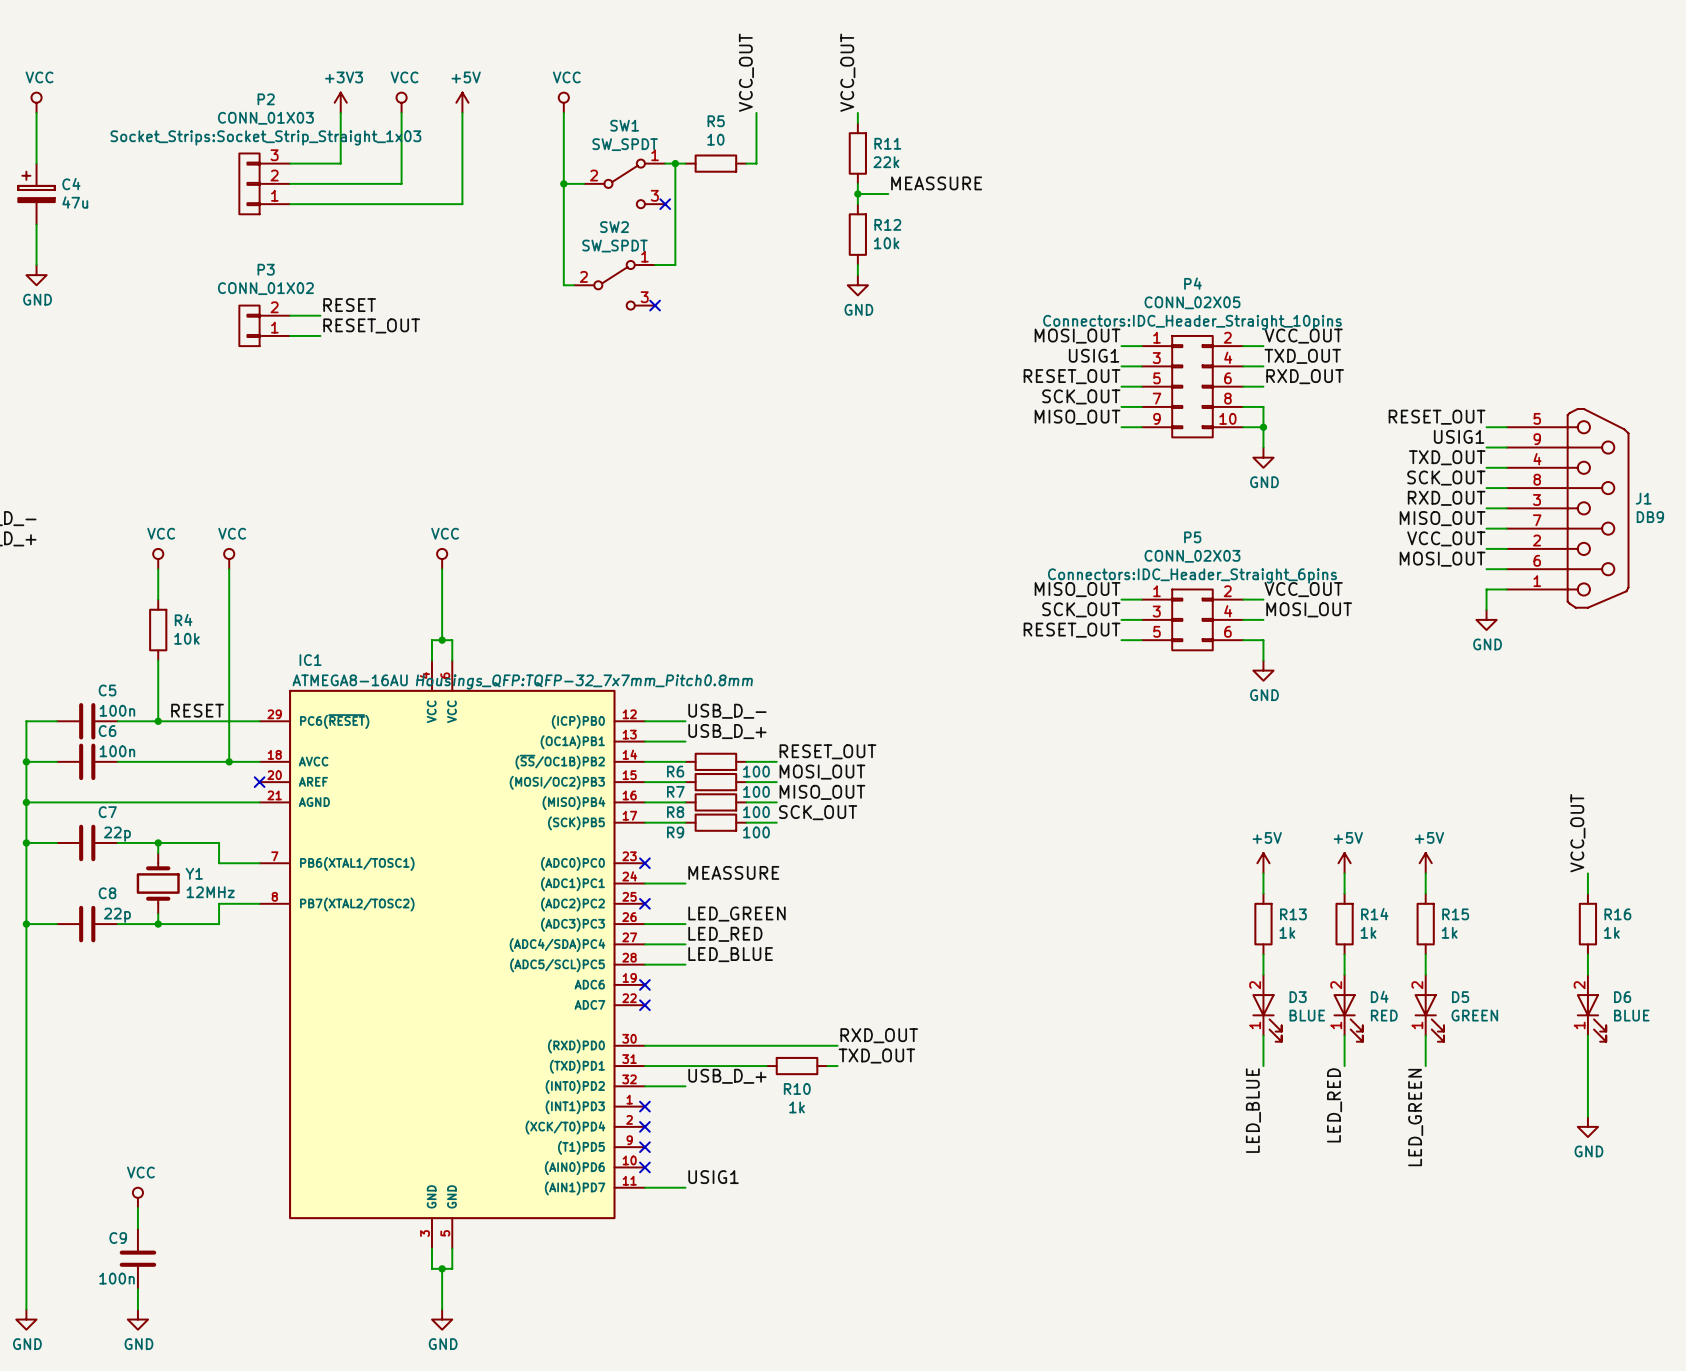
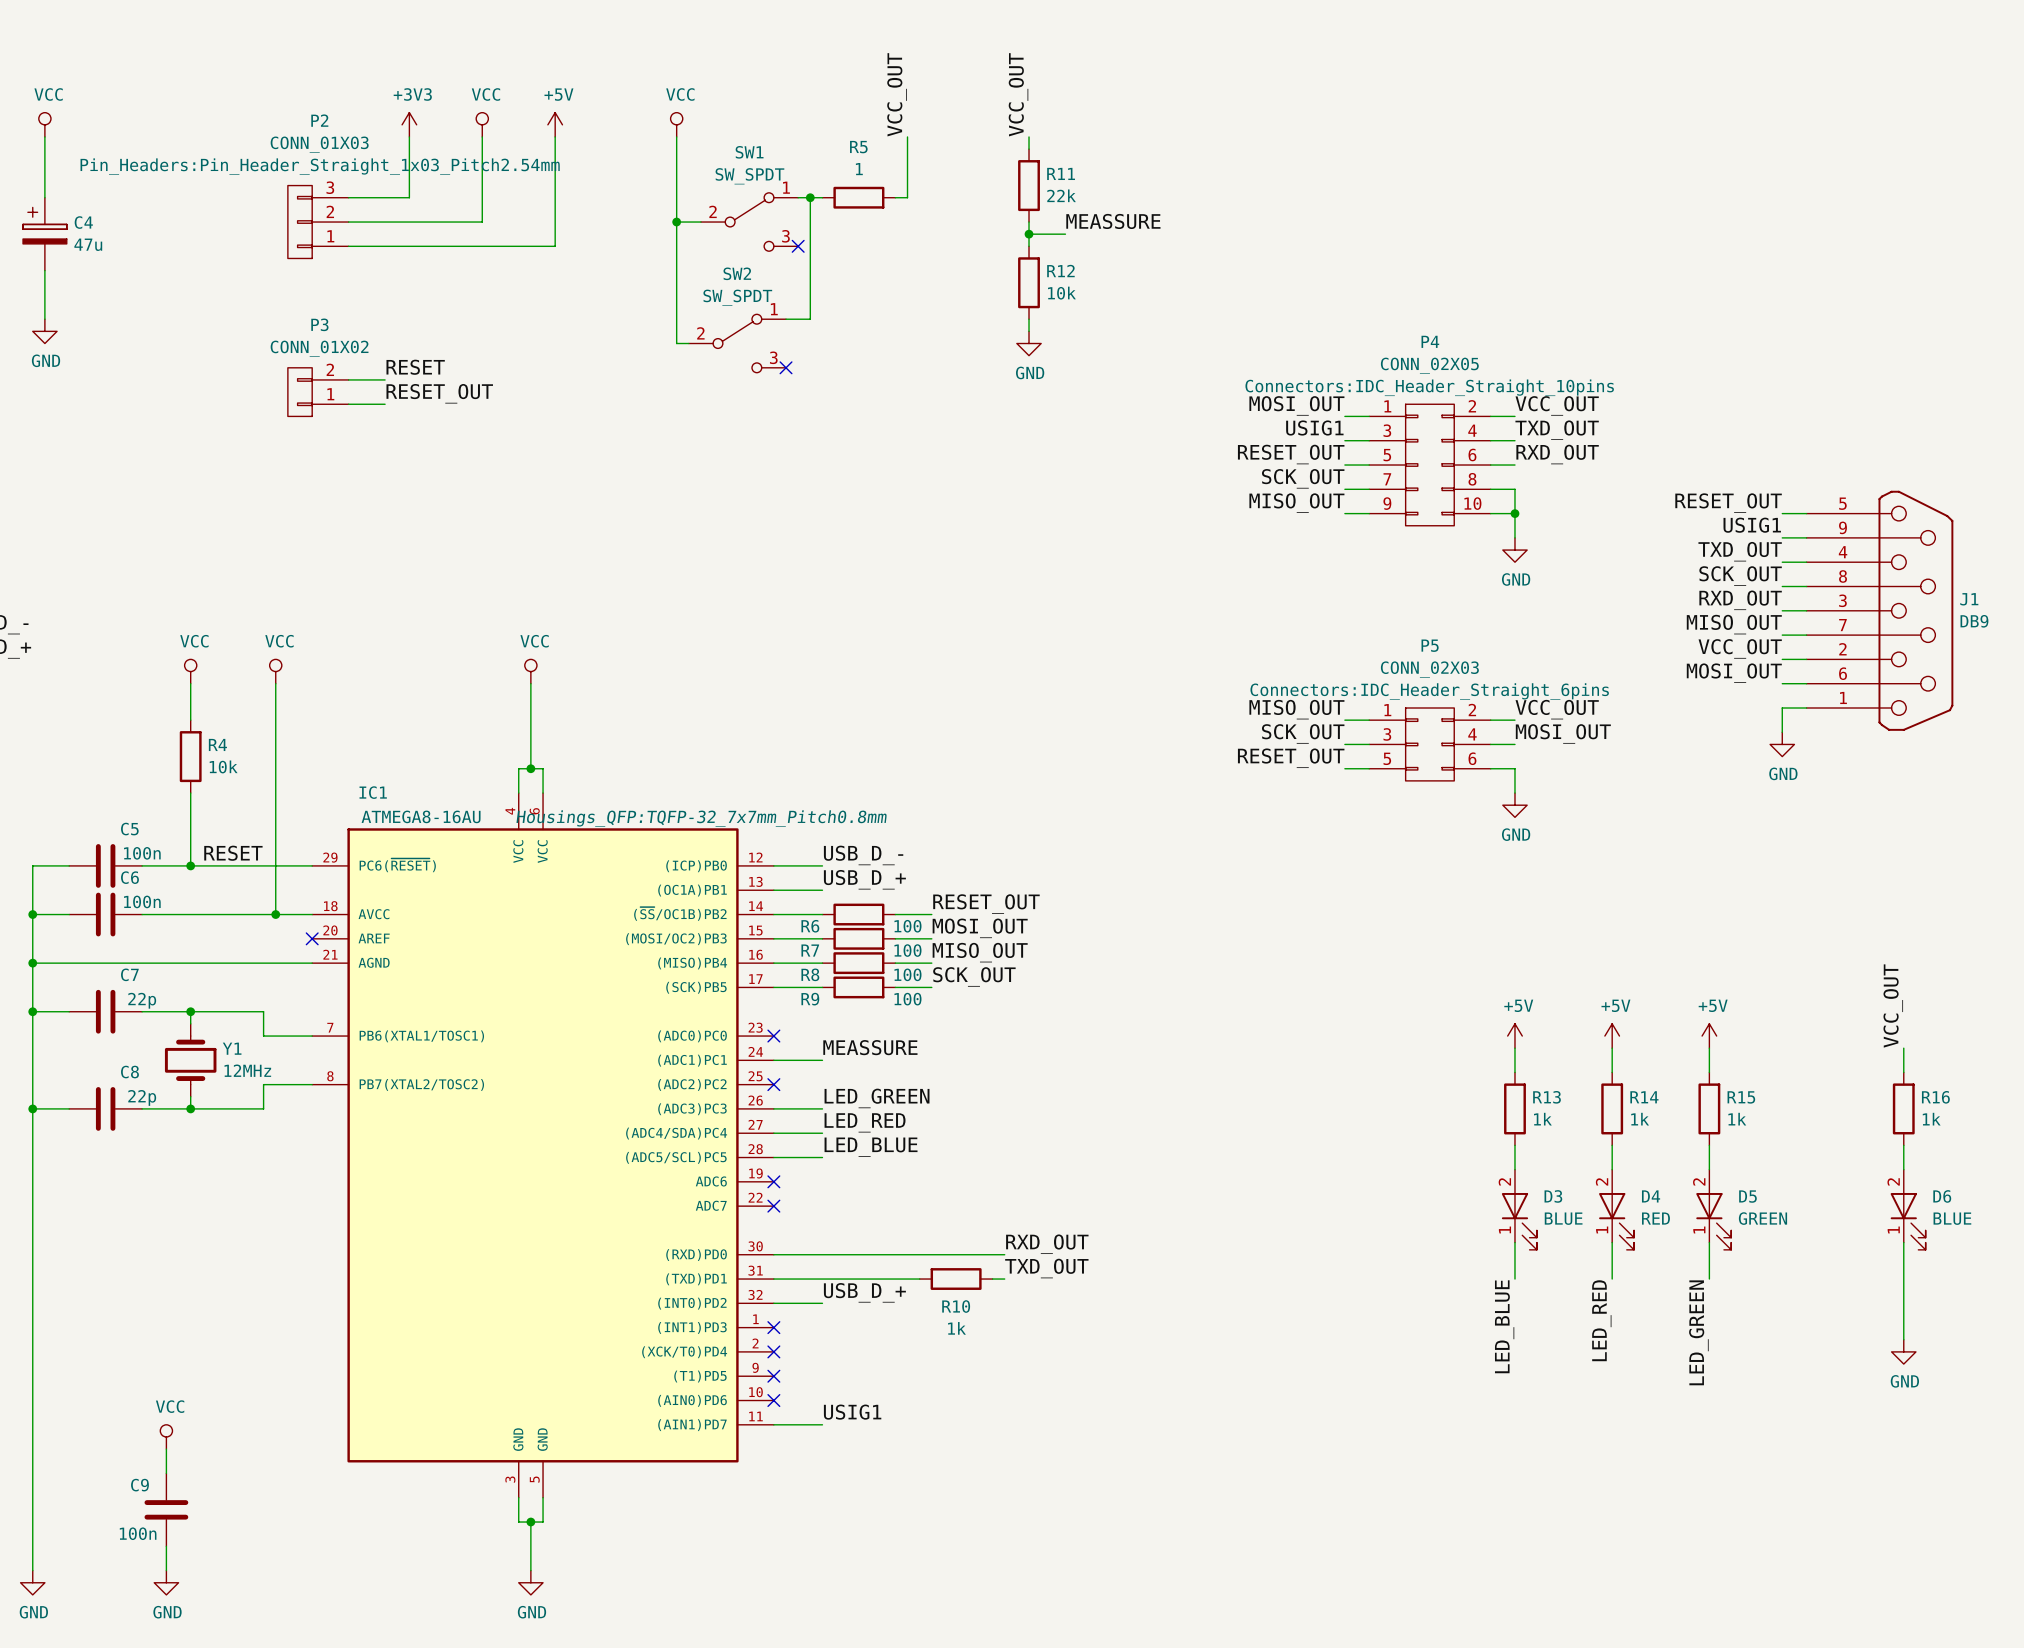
P2 text: Socket_Strips:Socket_Strip_Straight_1x03 (265, 137) -> Pin_Headers:Pin_Header_Straight_1x03_Pitch2.54mm (320, 166)
R5 value: 10 (715, 139) -> 1 (859, 169)

